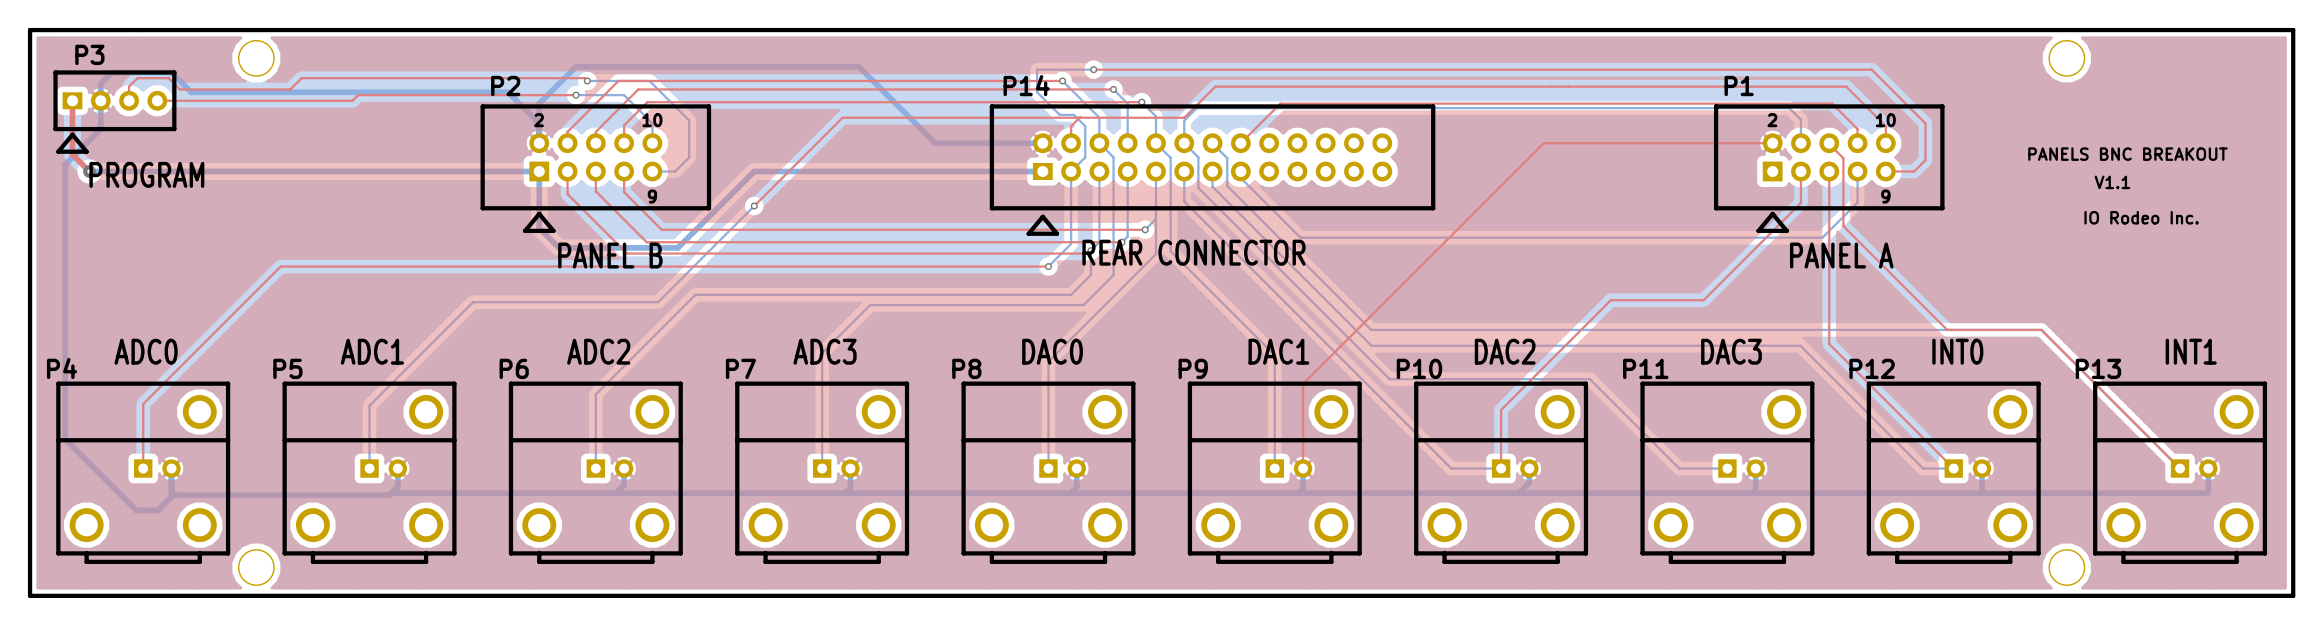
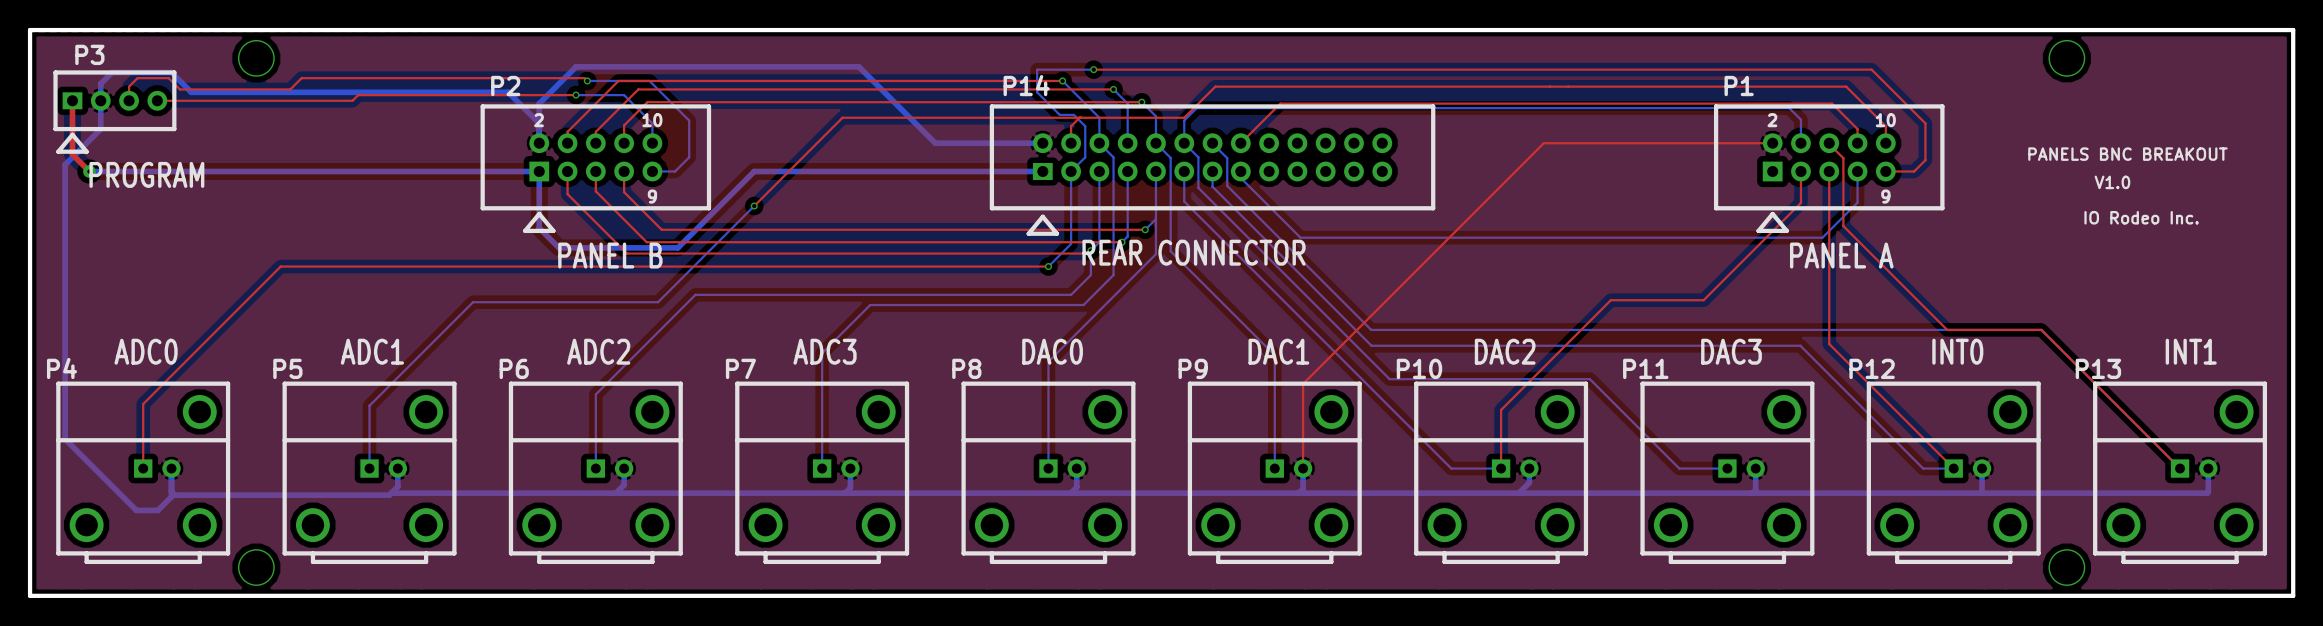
text: V1.1 (2112, 182) -> V1.0 (2112, 182)

